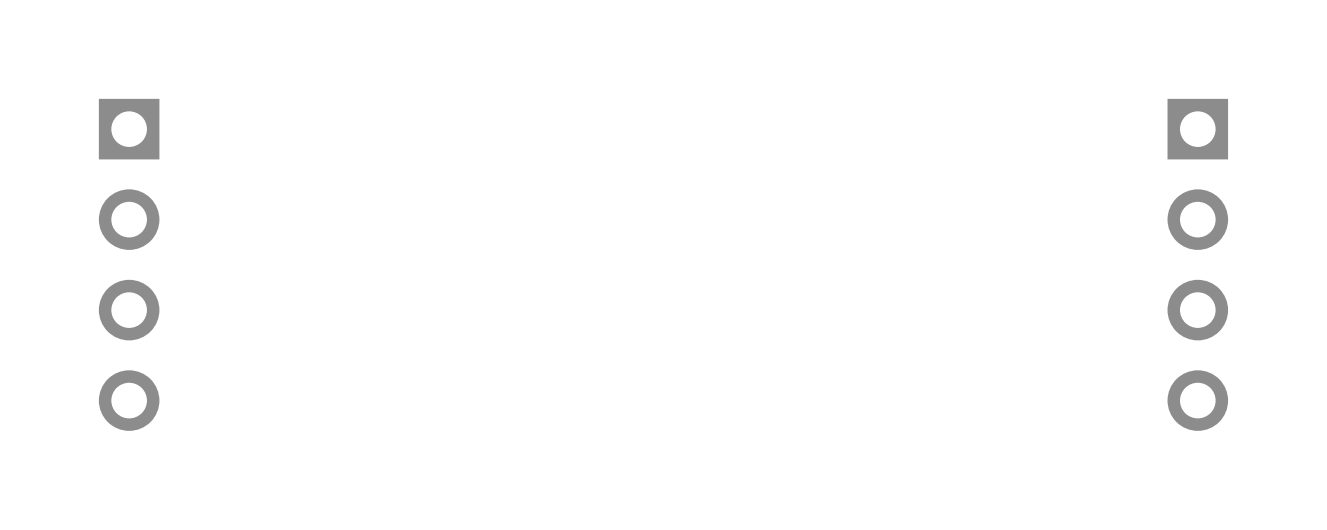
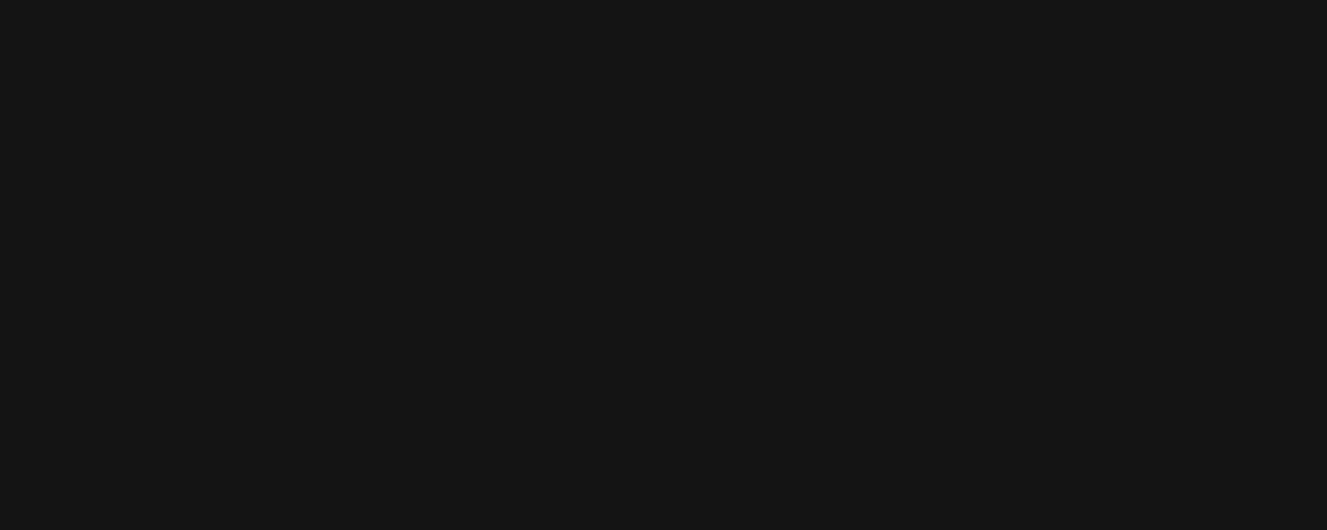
part: (129, 264) -> none
part: (1197, 264) -> none

